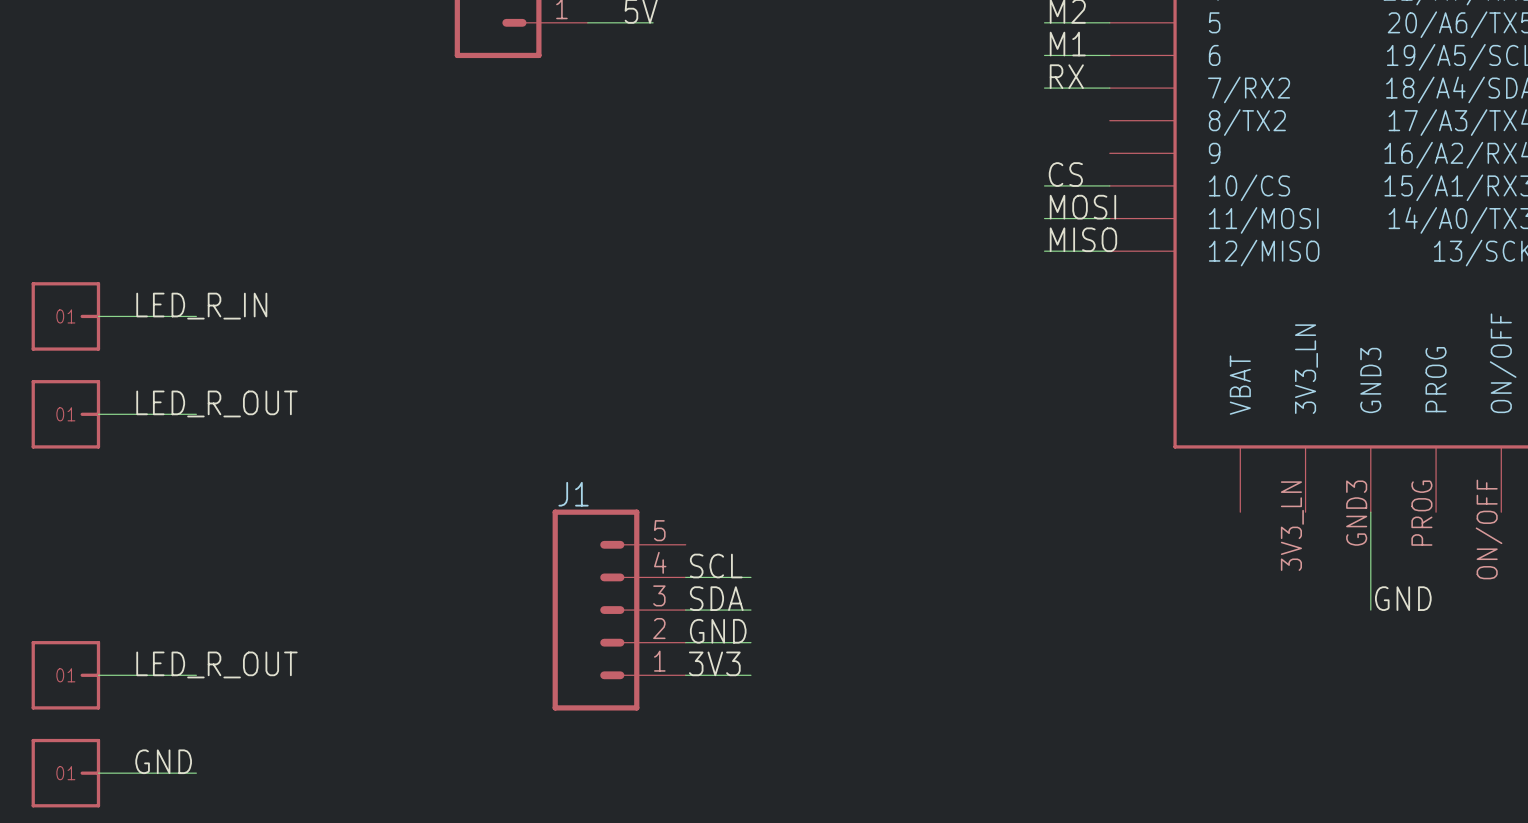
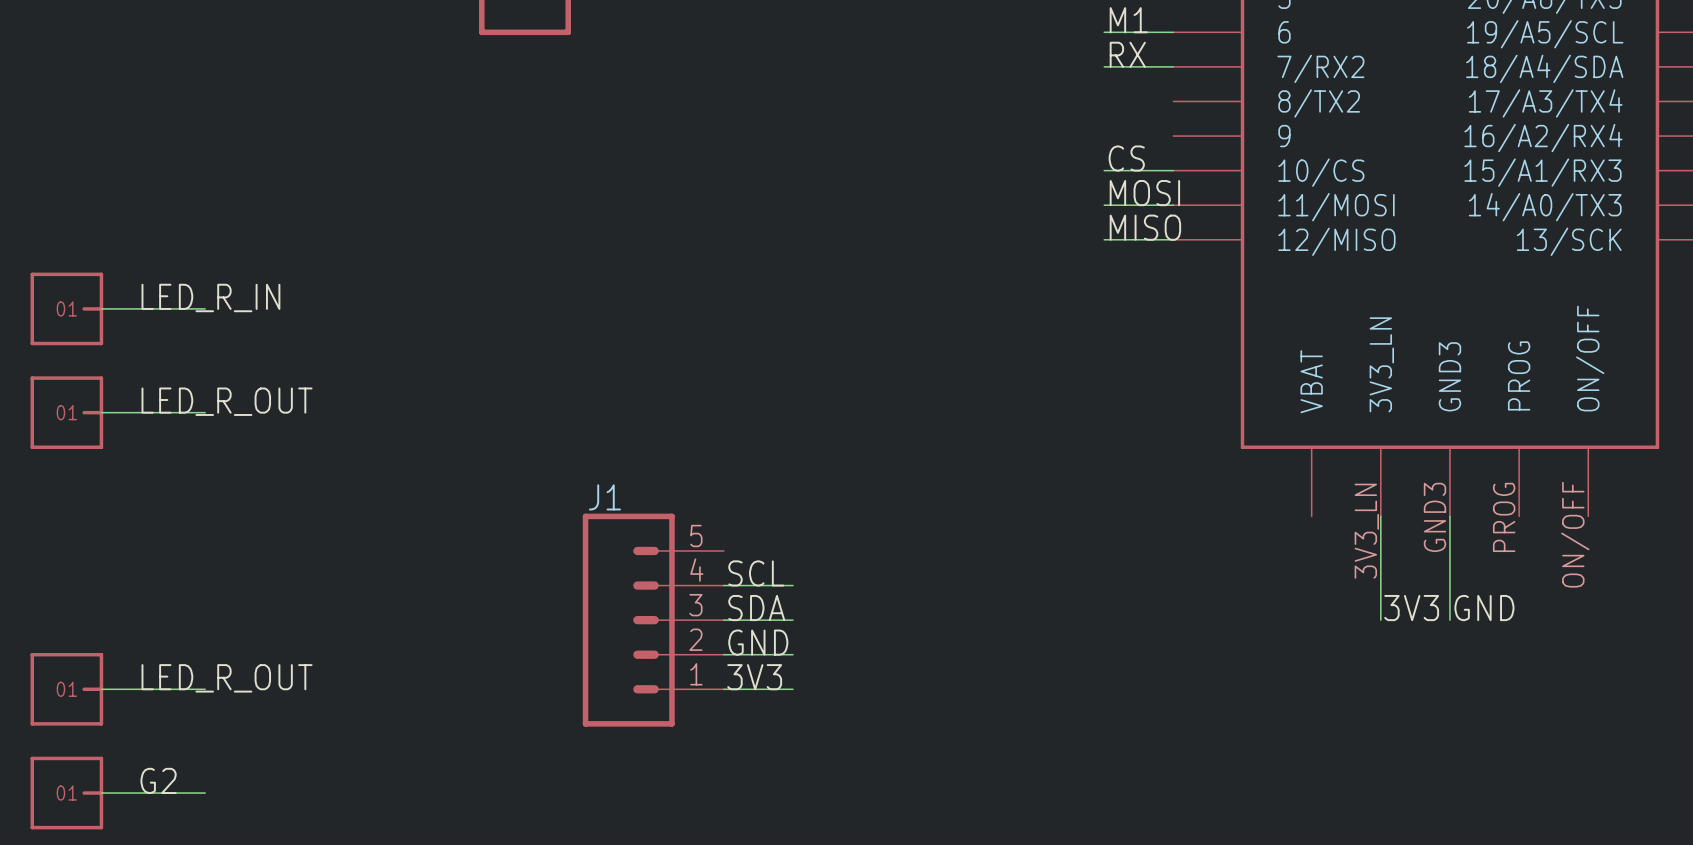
wire: none -> (1380, 516) (1380, 620)
label: none -> 3V3 (1411, 608)
label: GND (163, 761) -> G2 (158, 780)

